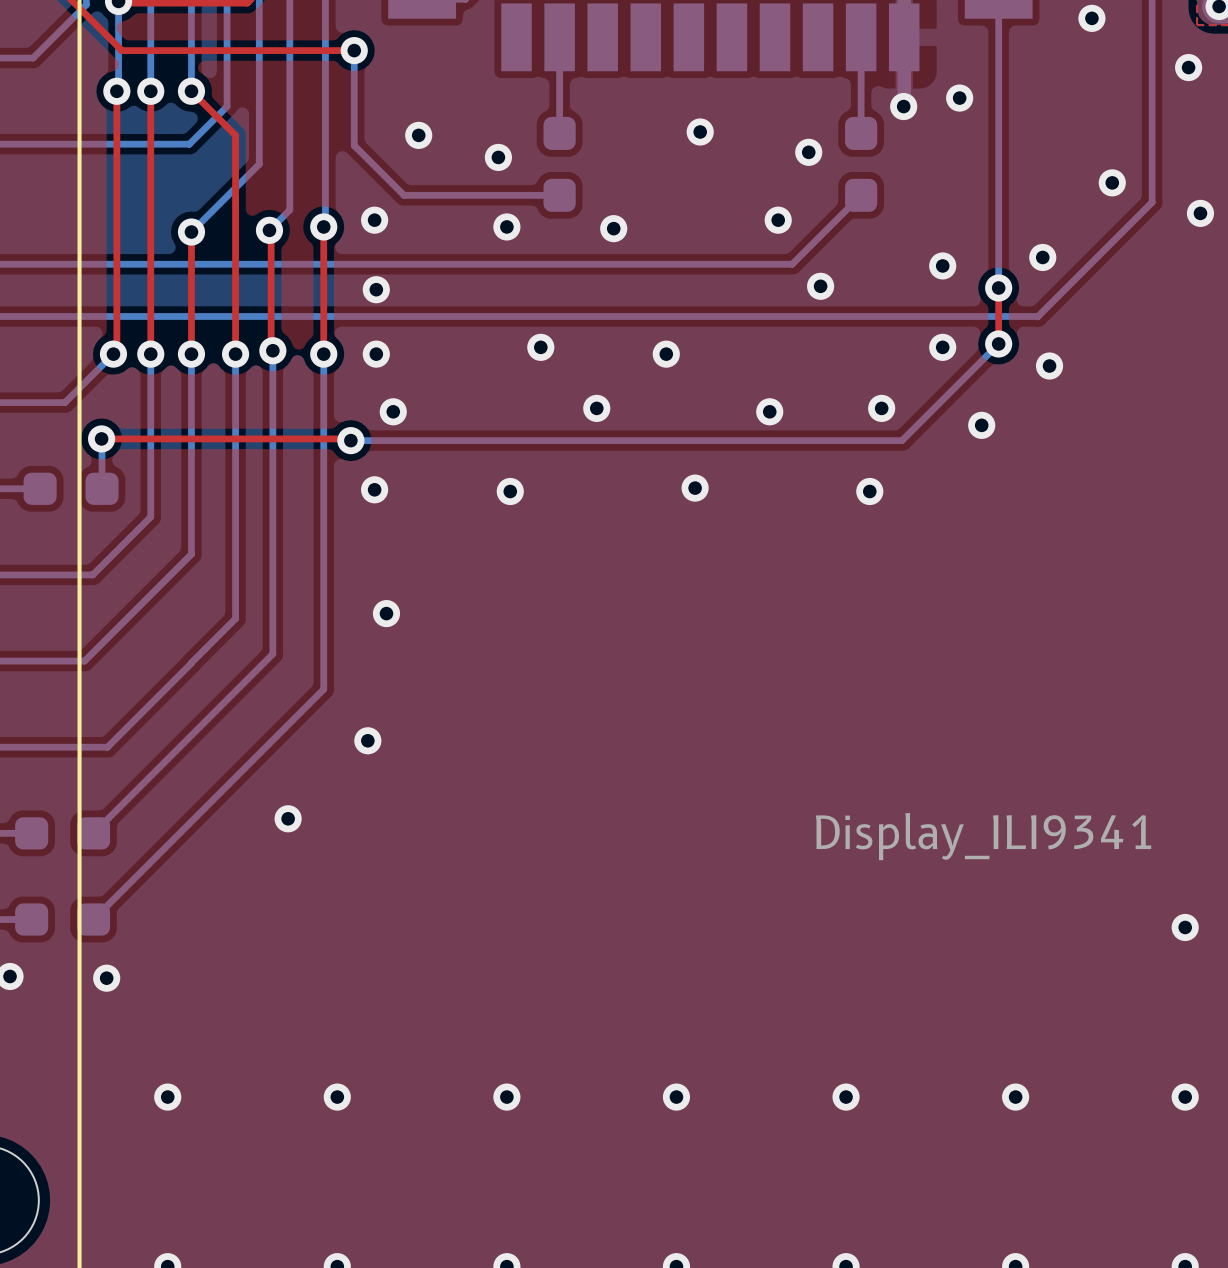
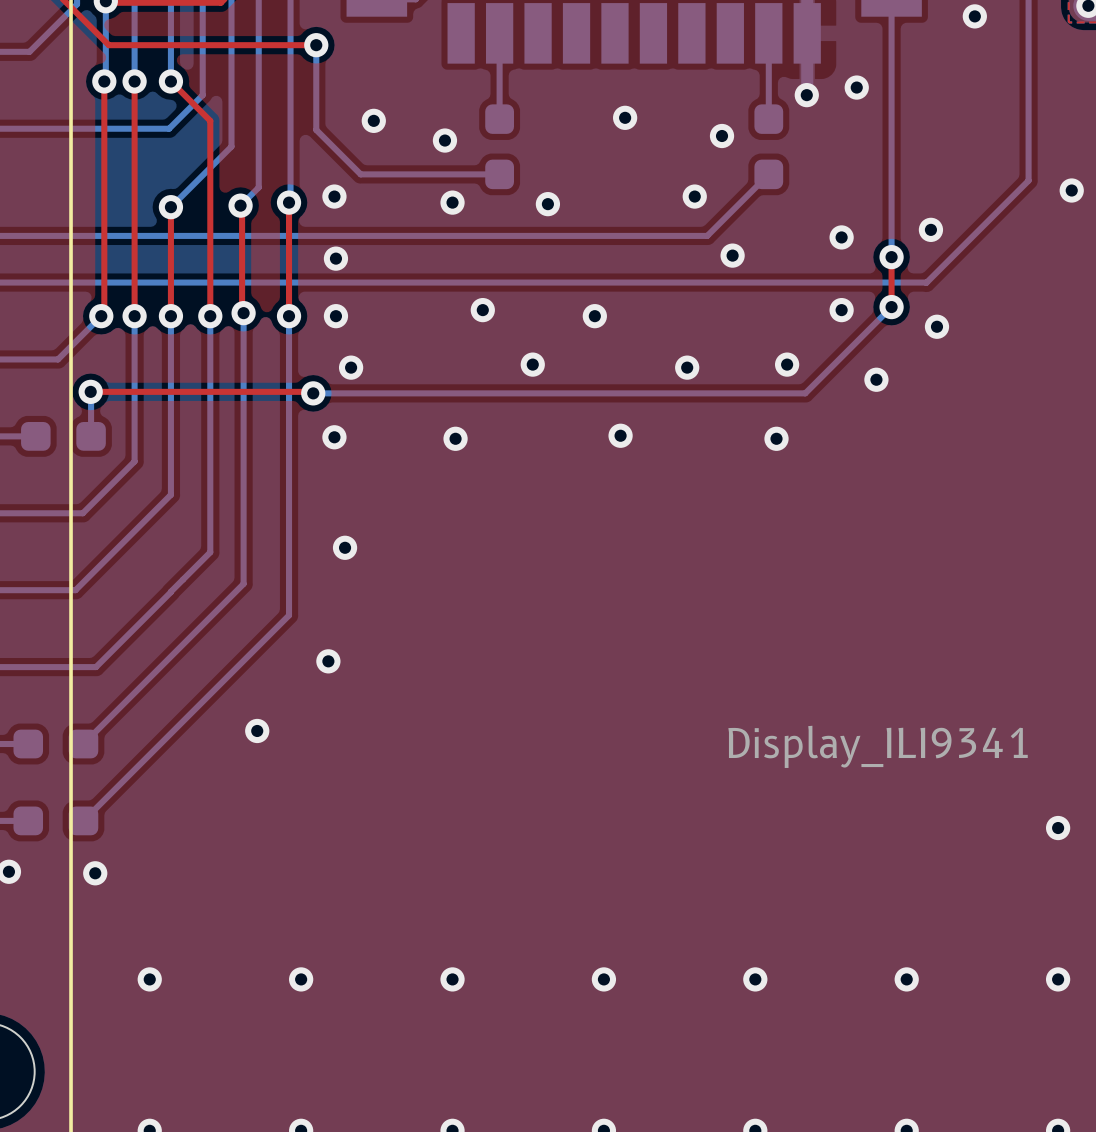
via: (1188, 67) -> none
via: (1112, 182) -> none

